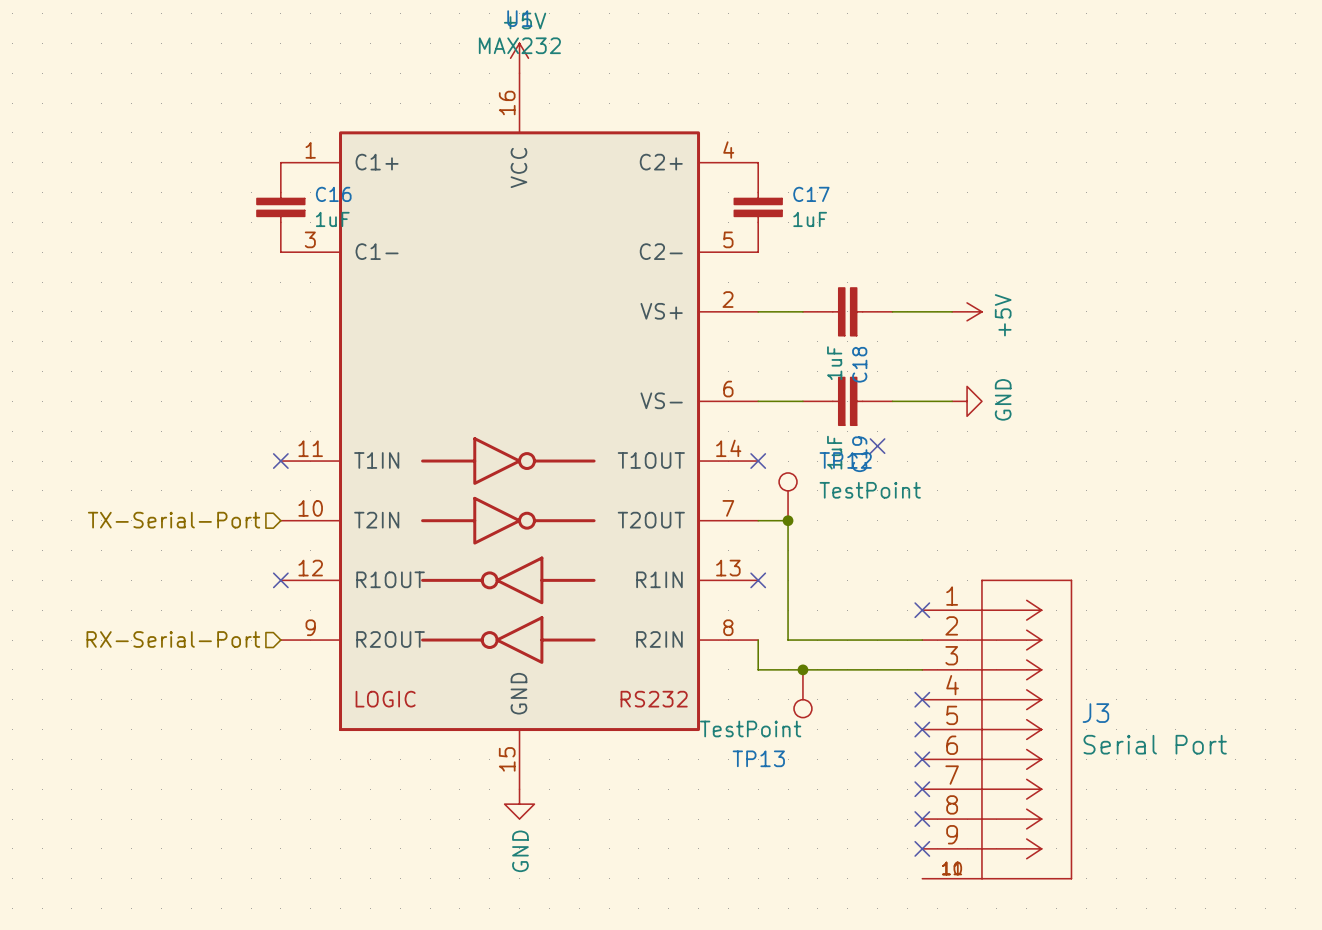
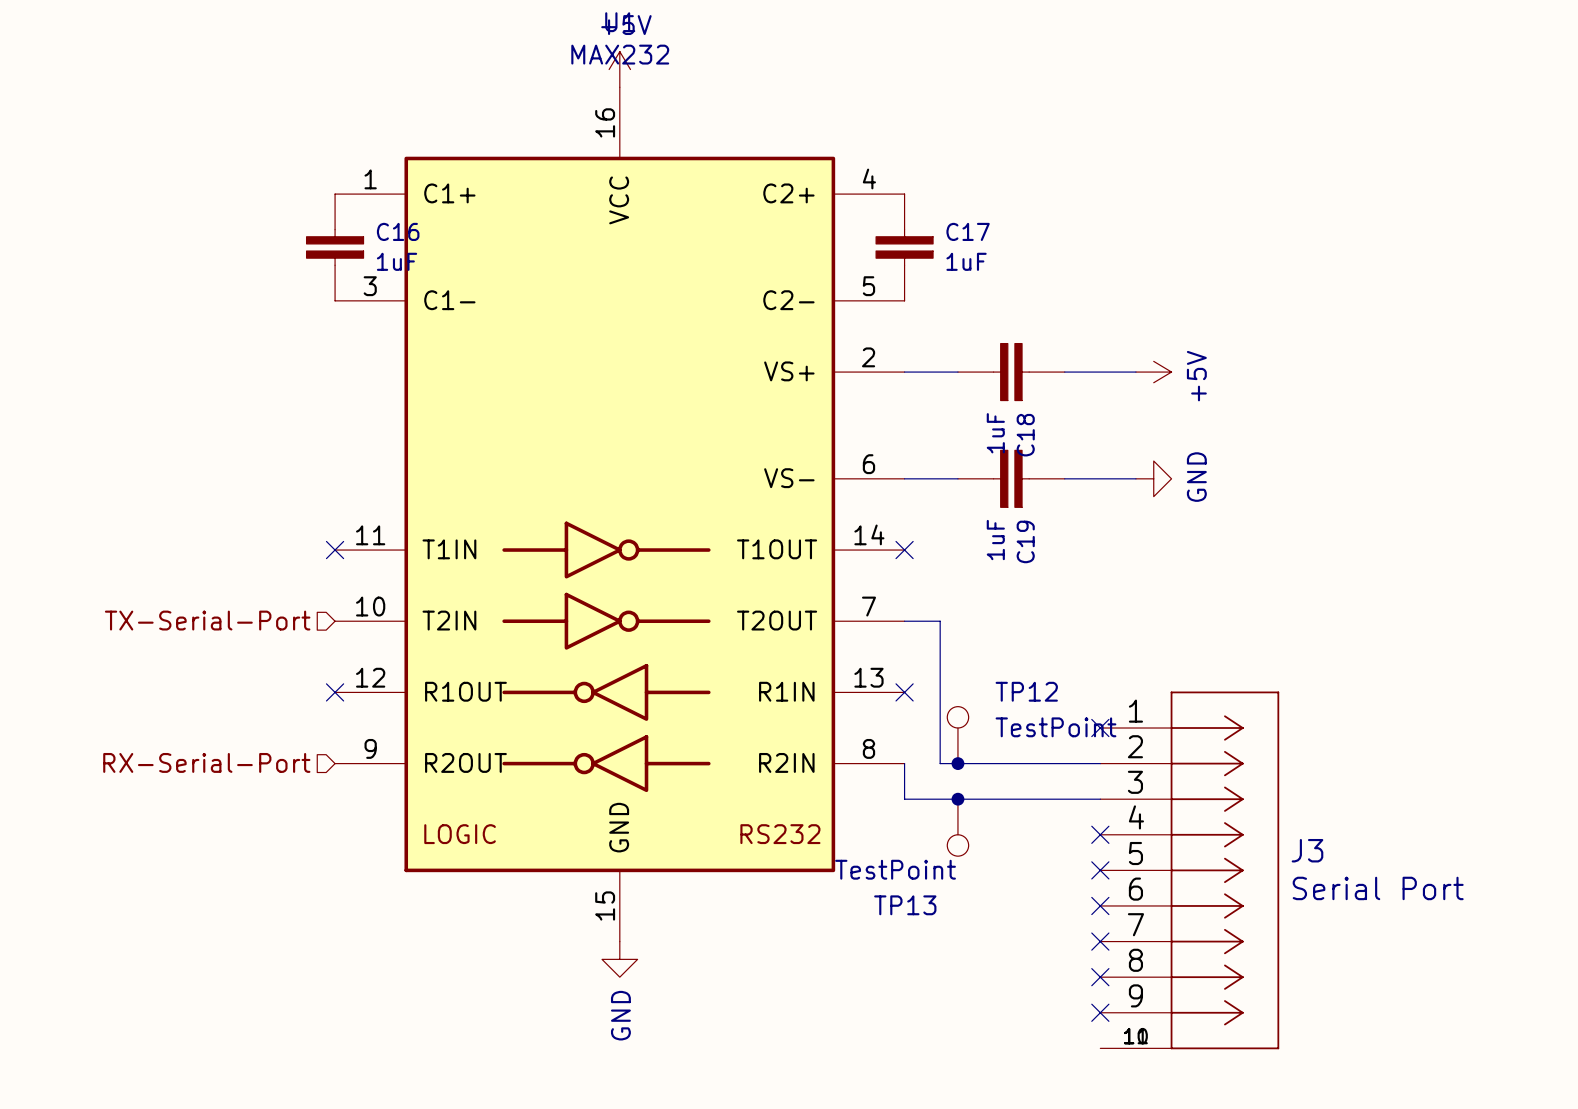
no-connect mark: (877, 446) -> none
TP12 position: (788, 496) -> (957, 735)
junction: (788, 520) -> none
junction: none -> (957, 763)

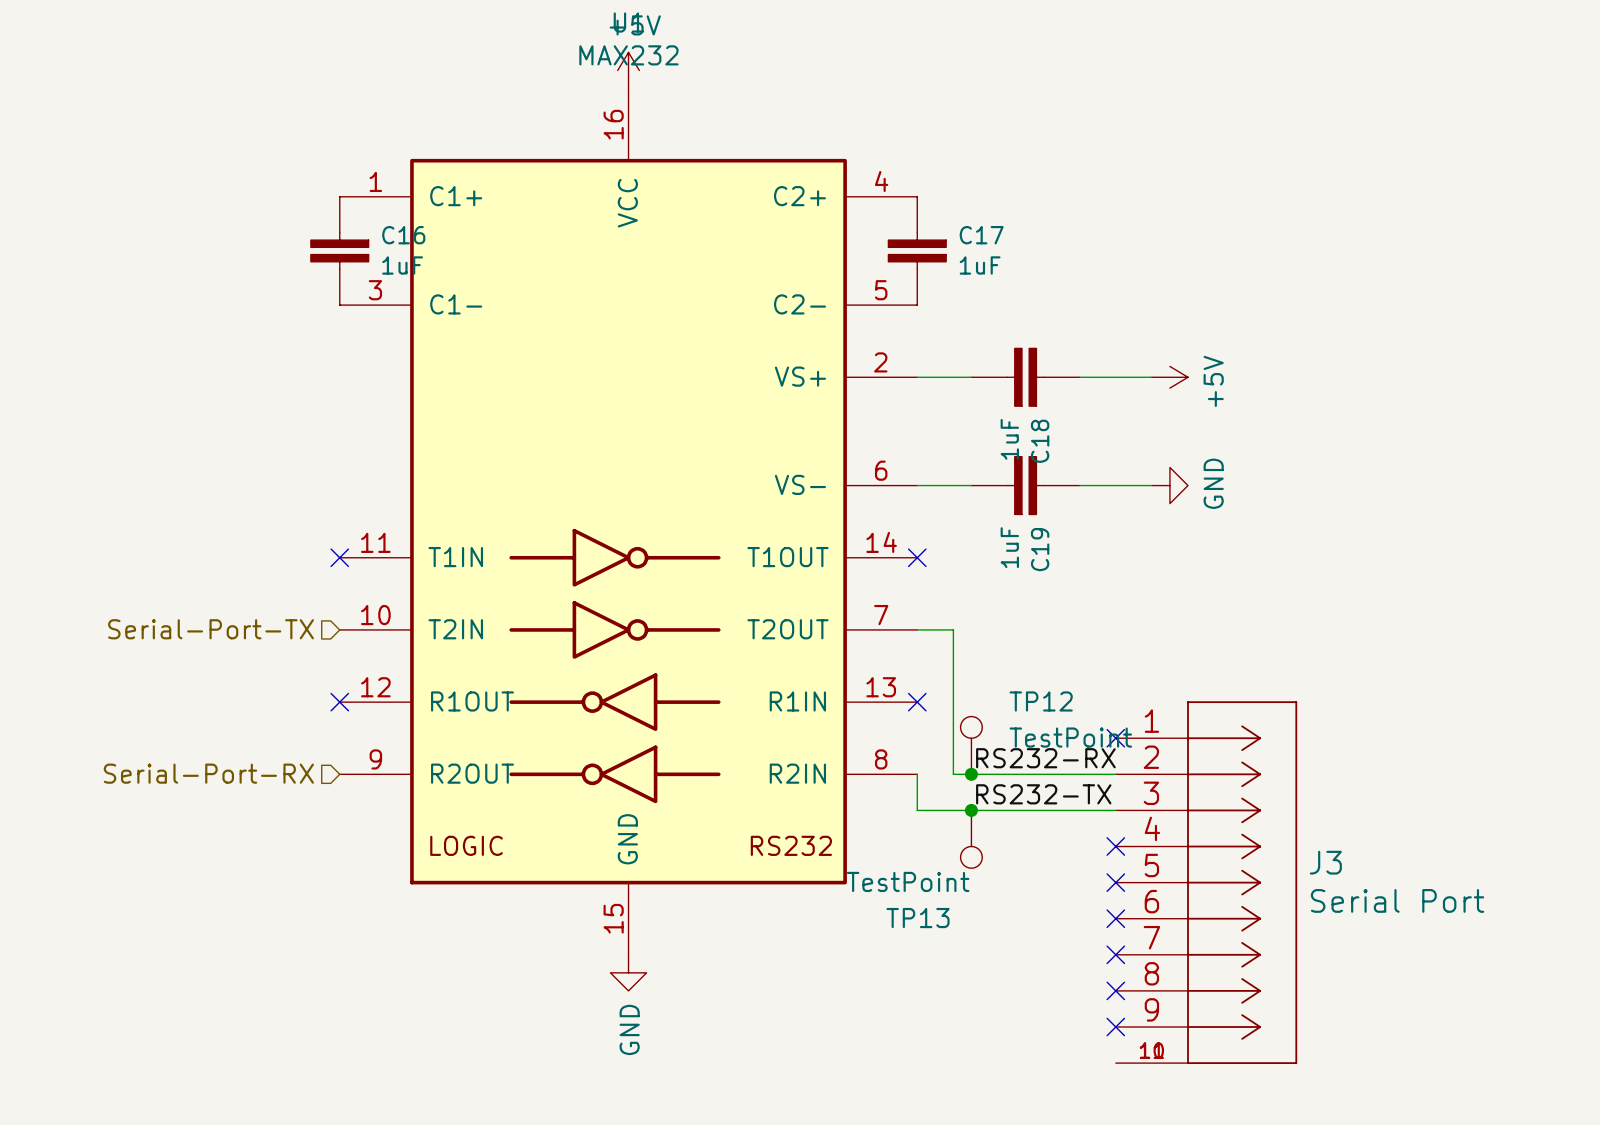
hierarchical label: TX-Serial-Port (207, 620) -> Serial-Port-TX (211, 629)
label: none -> RS232-RX (1045, 758)
hierarchical label: RX-Serial-Port (206, 762) -> Serial-Port-RX (208, 773)
label: none -> RS232-TX (1043, 794)

